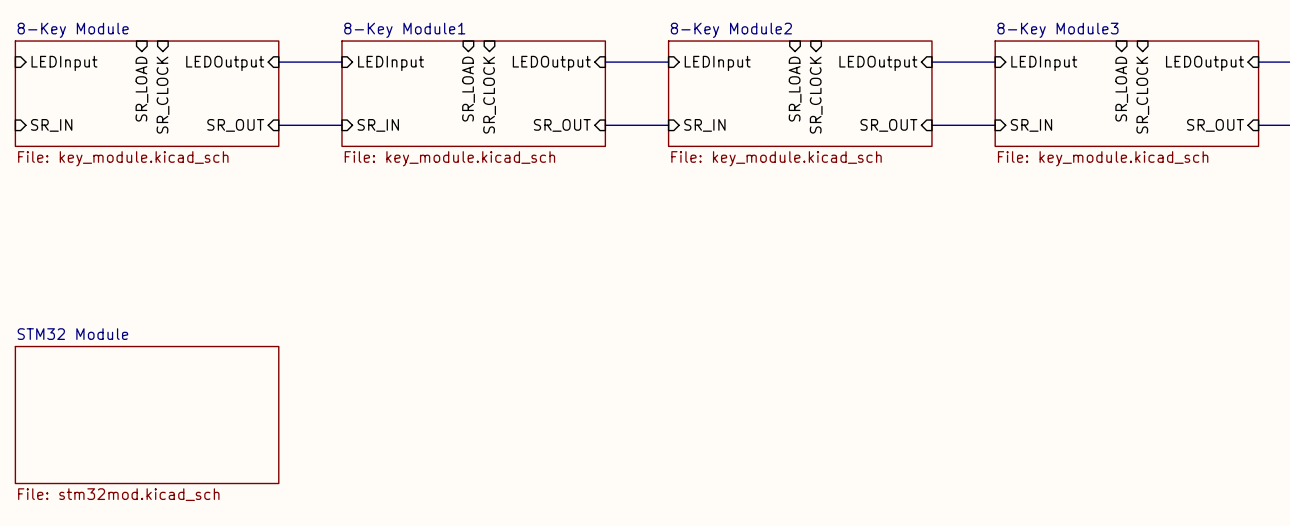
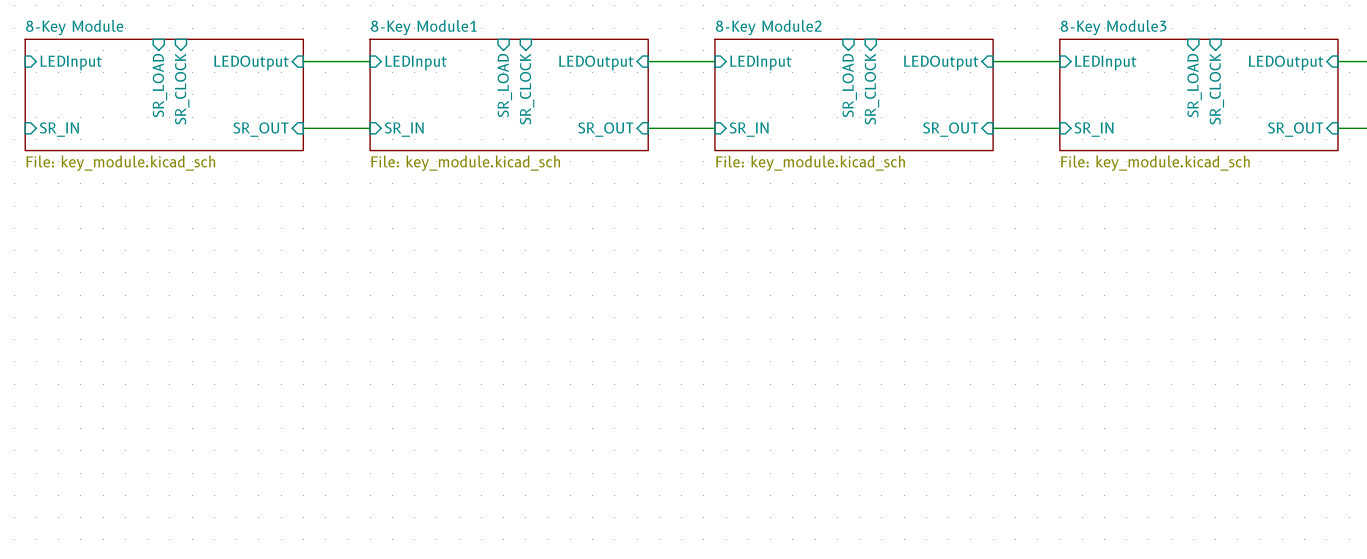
sheet STM32 Module: File: stm32mod.kicad_sch (147, 415) -> none

